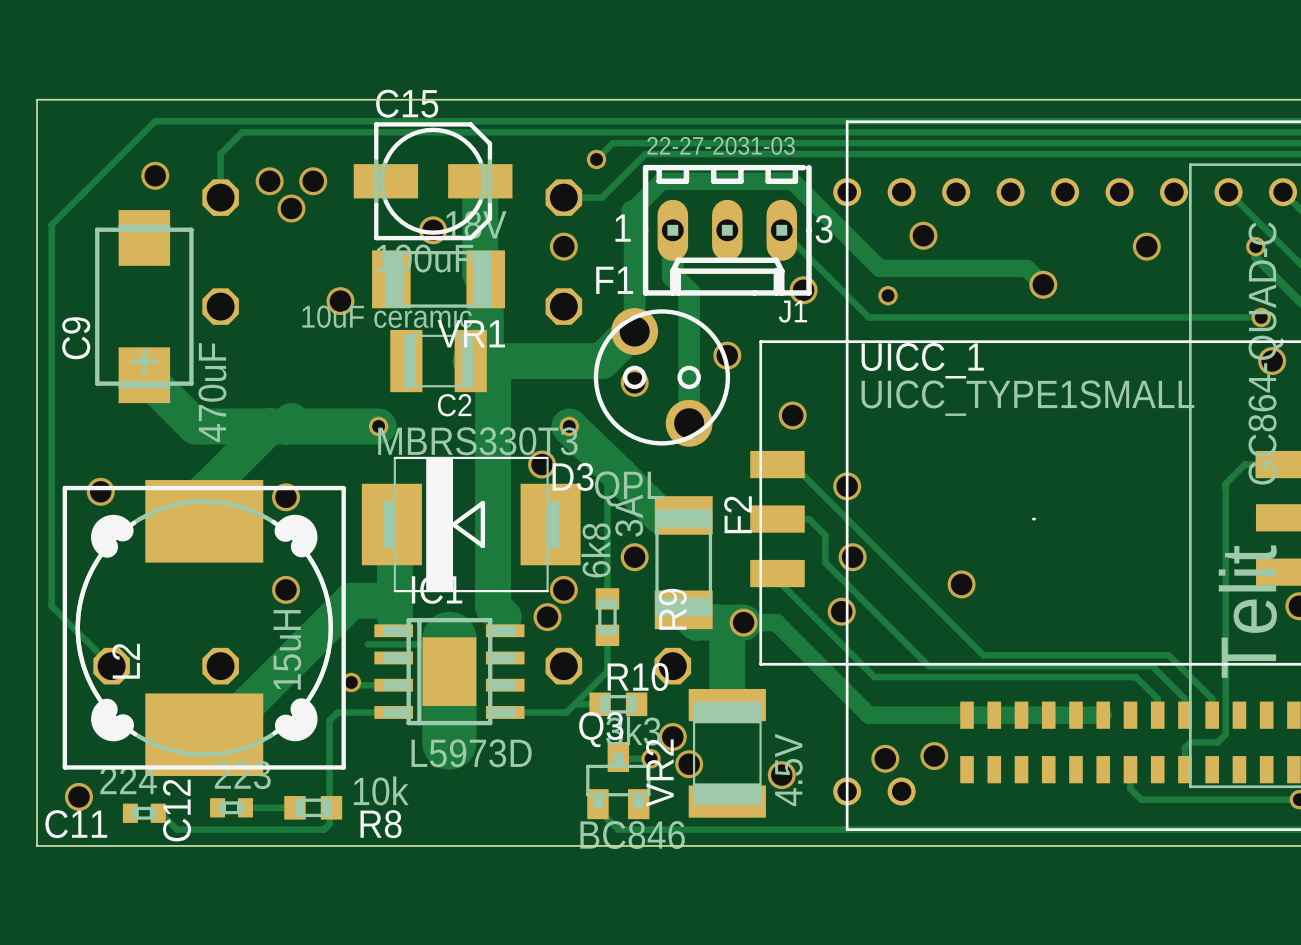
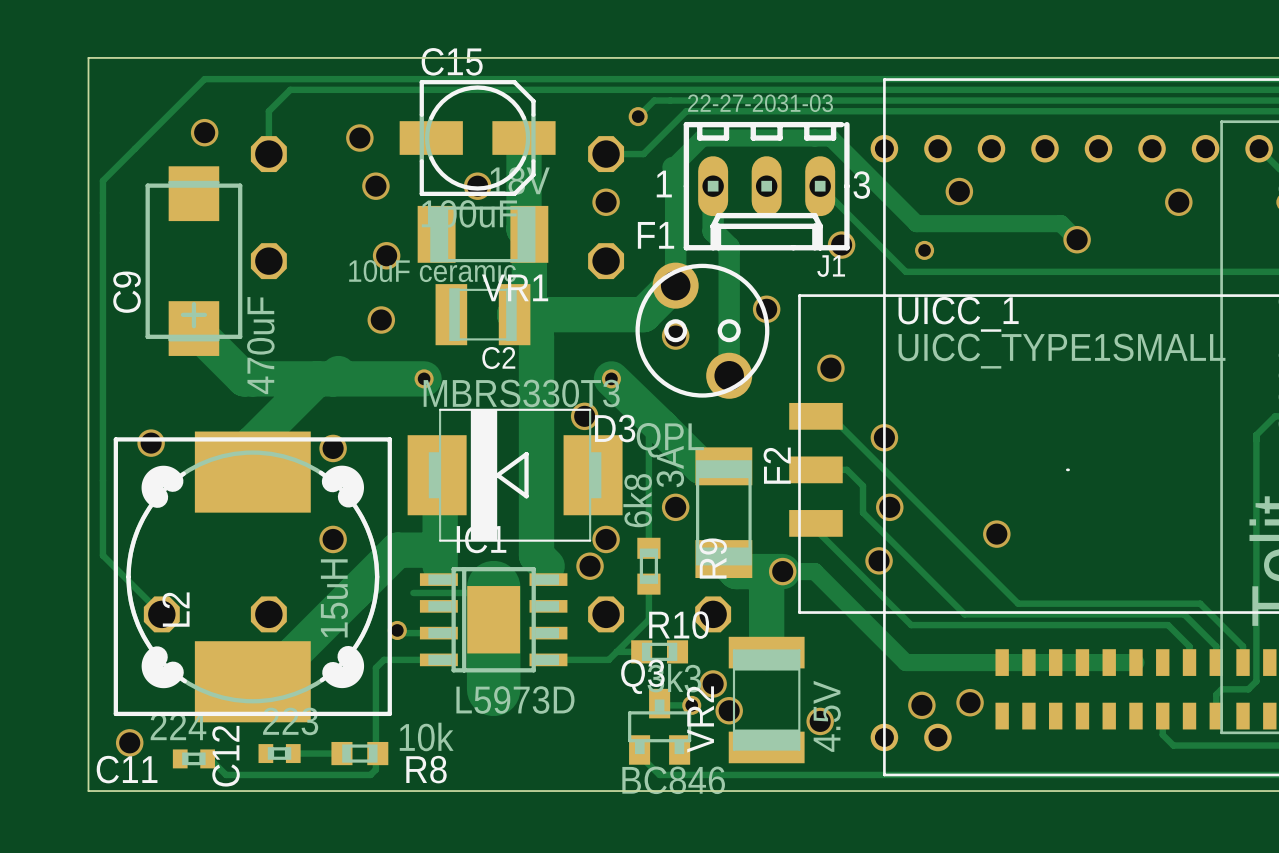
via: (269, 181) -> none
via: (291, 208) -> none
via: none -> (375, 186)
via: none -> (381, 320)

